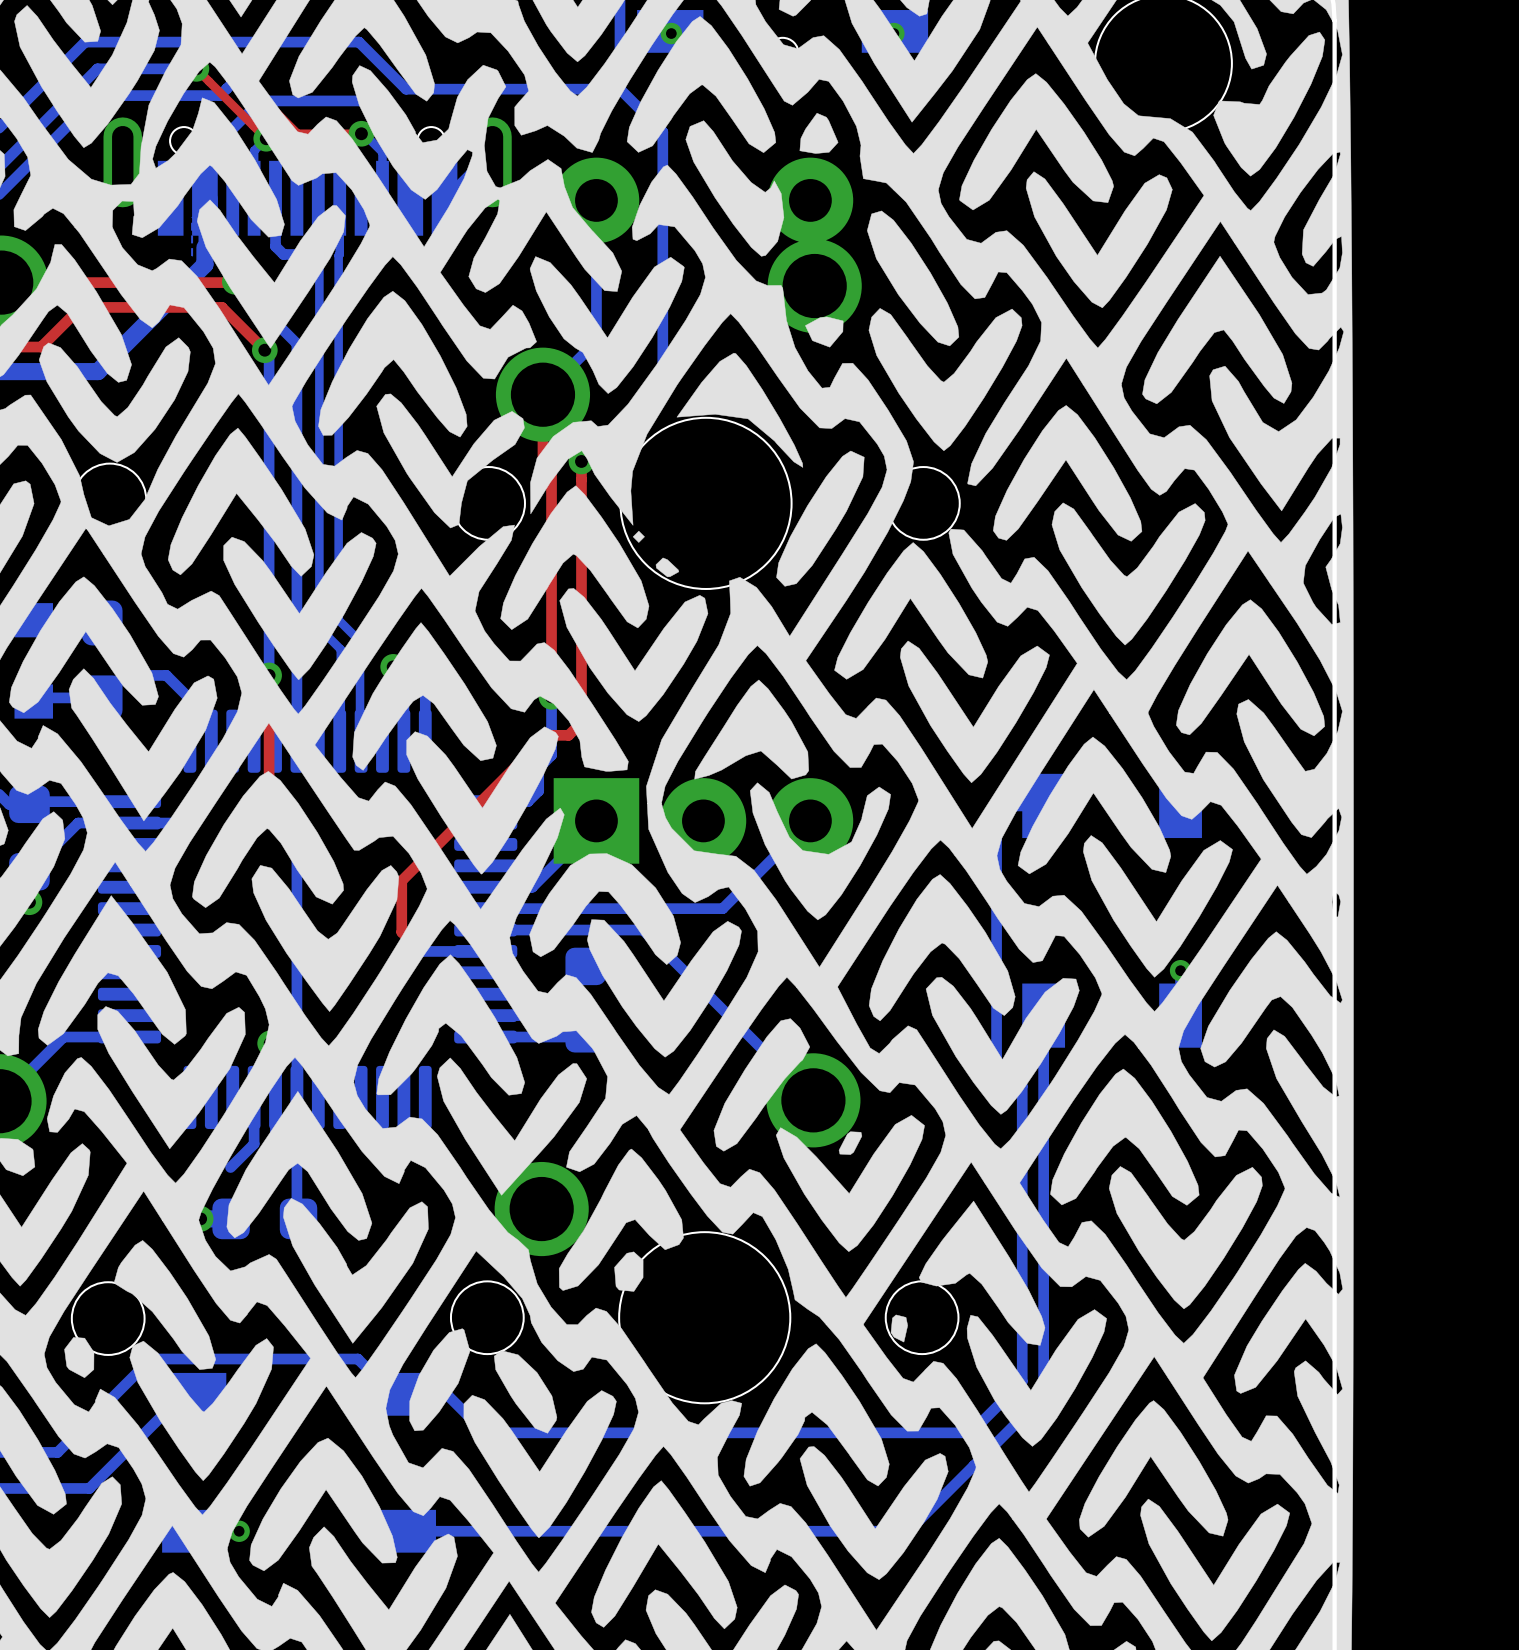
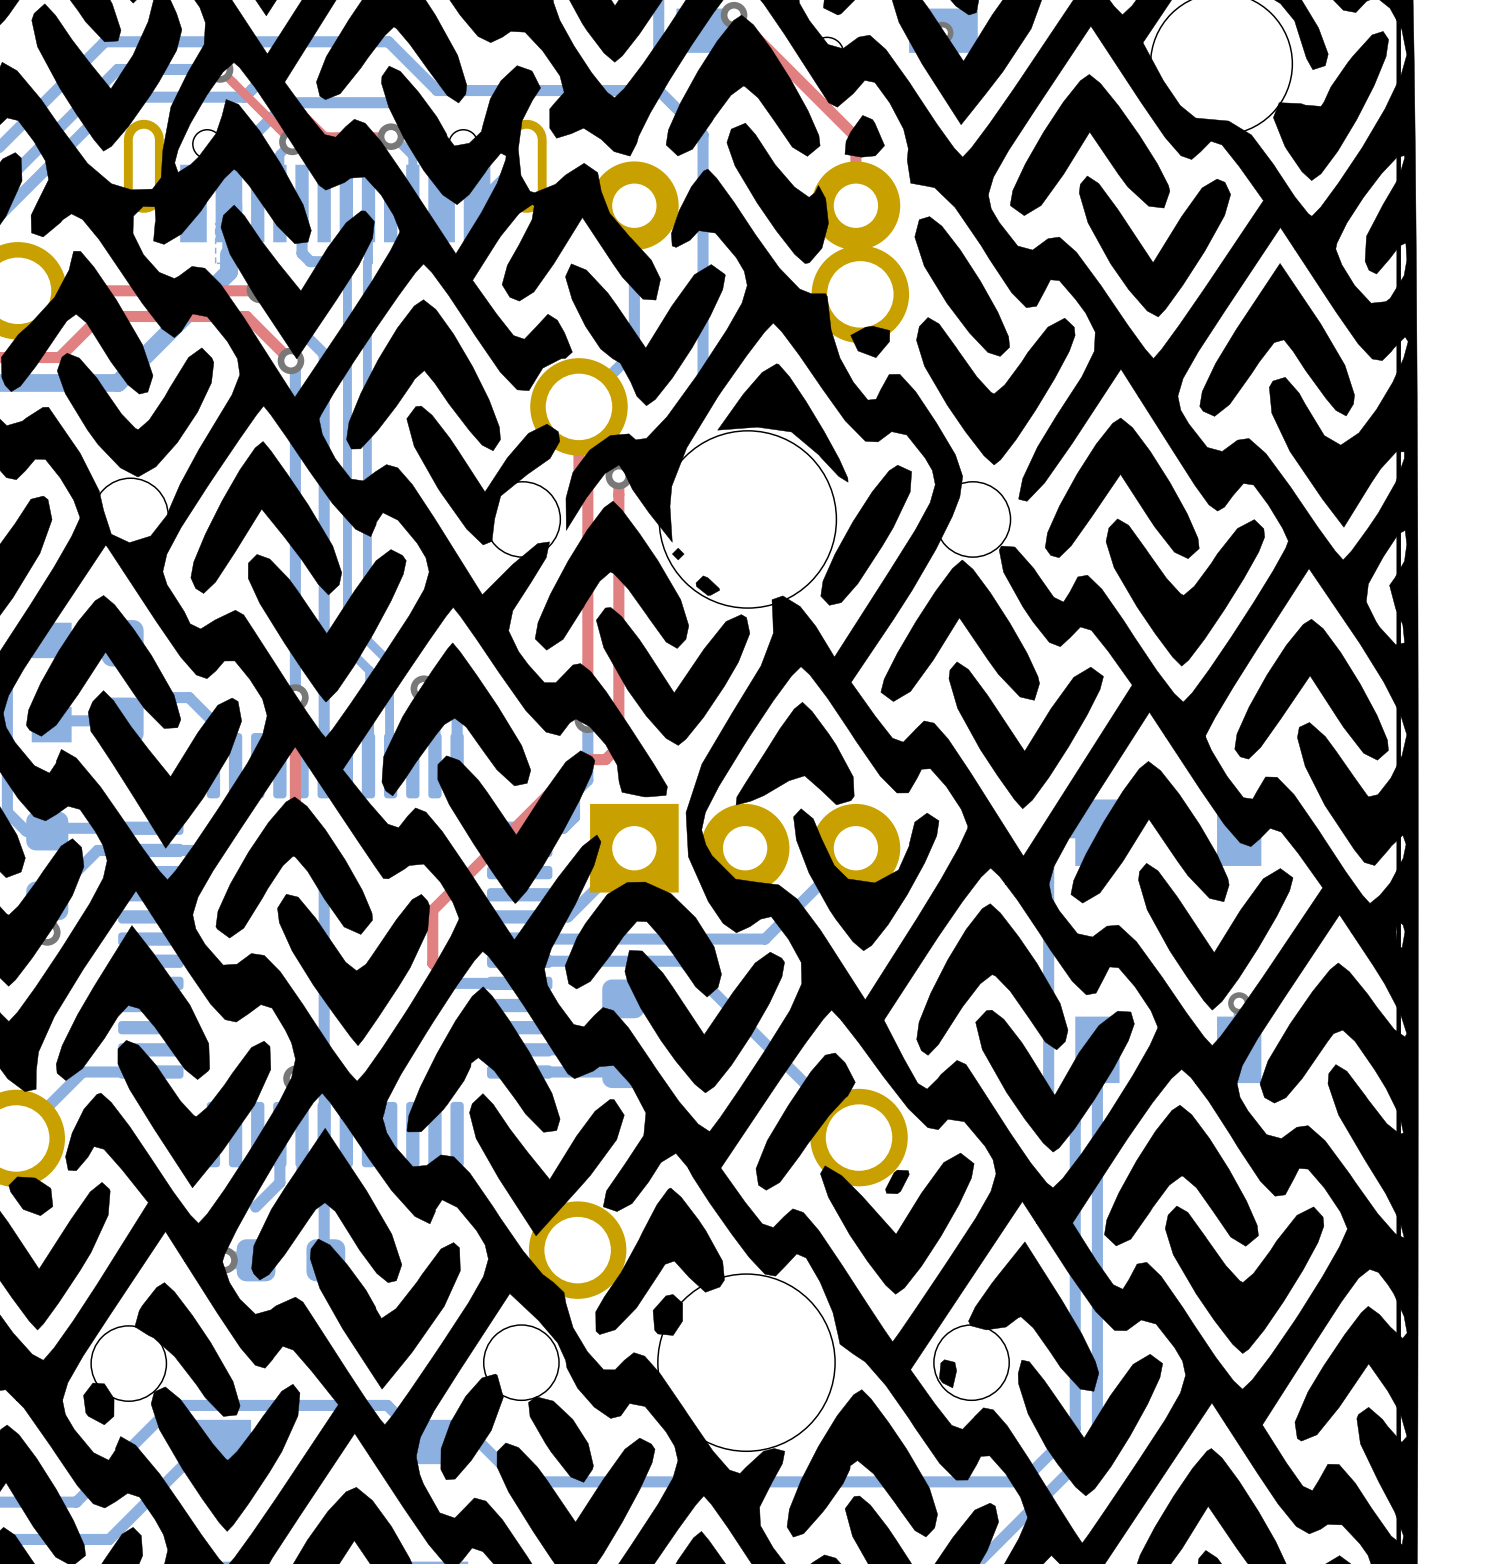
top track: none -> (734, 15) (855, 137) (855, 205)
via position: (671, 33) -> (734, 15)

